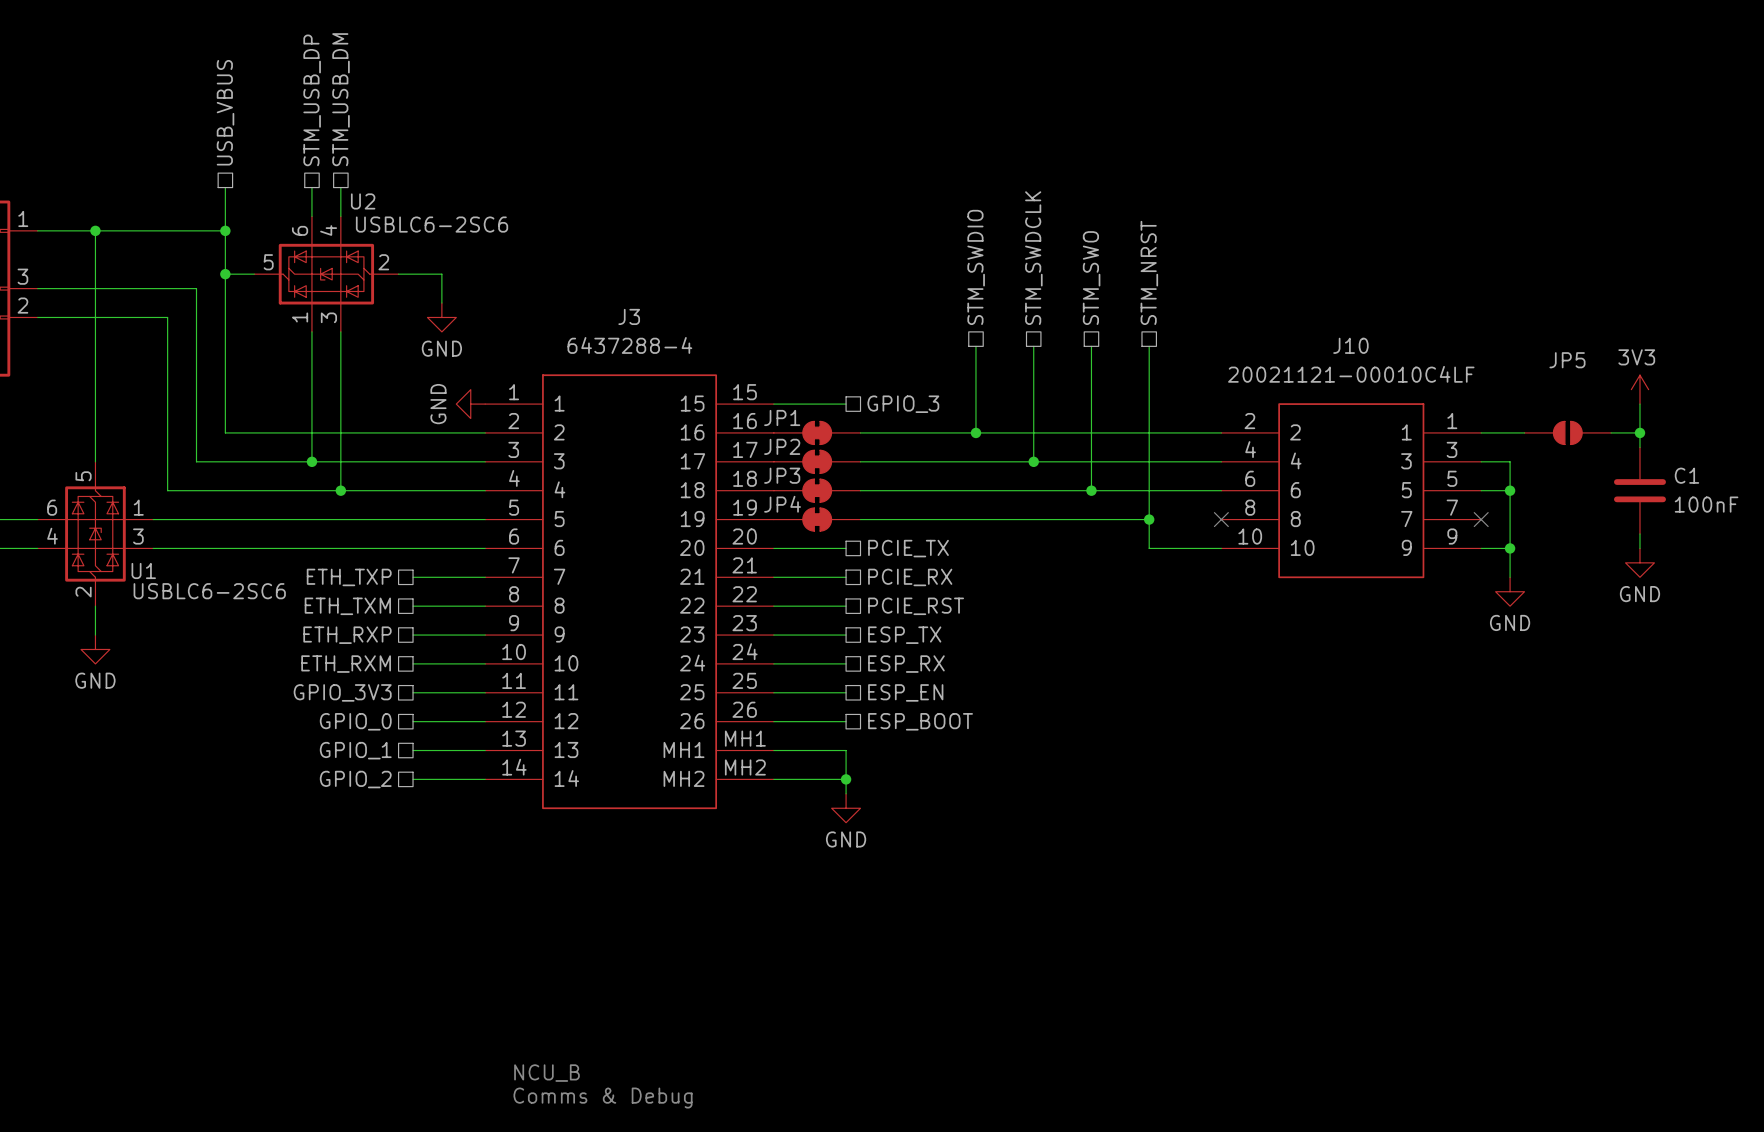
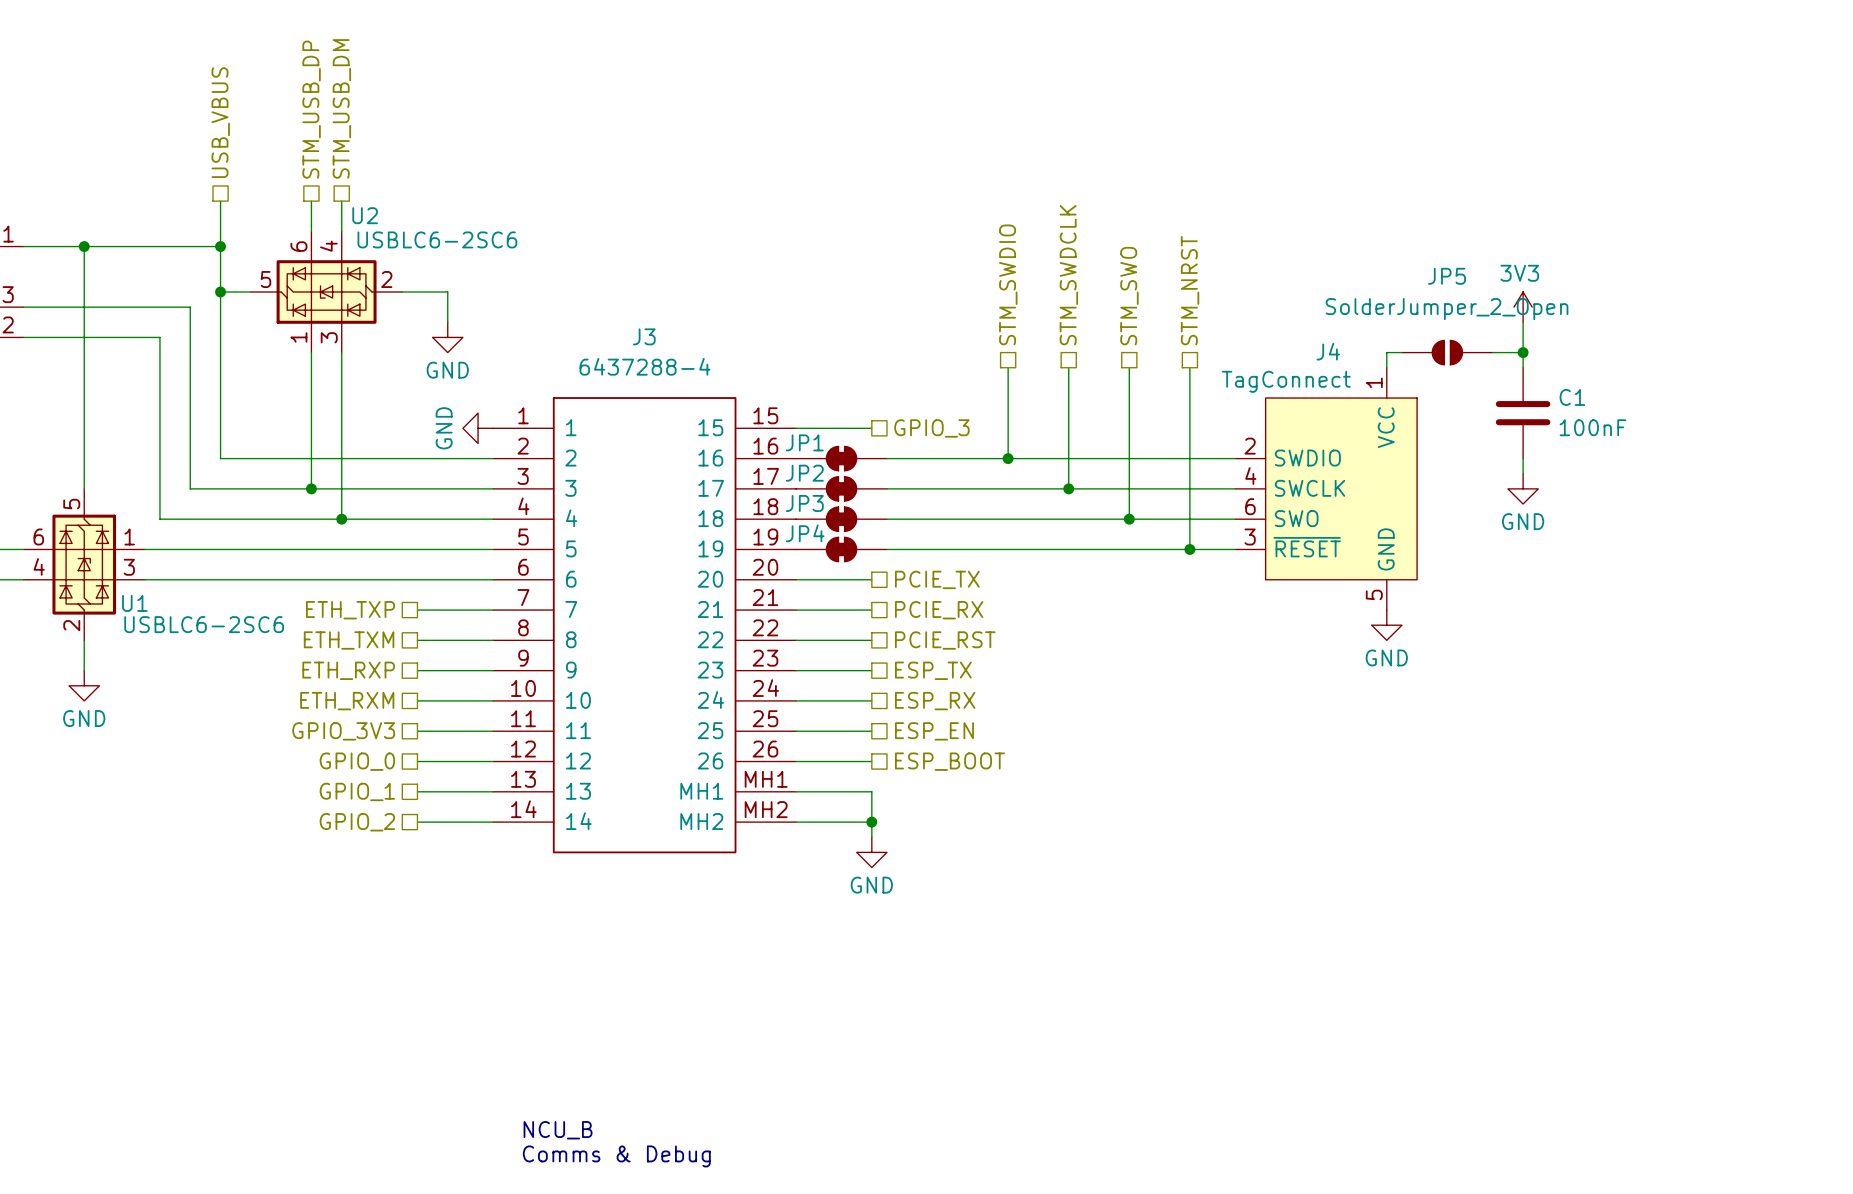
JP5 value: none -> SolderJumper_2_Open (1447, 309)
wire: none -> (1401, 352) (1386, 352) (1386, 367)
junction: none -> (1523, 352)
power symbol position: 3V3 (1639, 389) -> 3V3 (1523, 307)
wire: (1639, 404) (1639, 447) -> (1523, 322) (1523, 367)
wire: (1481, 432) (1524, 432) -> none
JP5 position: (1567, 432) -> (1447, 352)
wire: (1611, 432) (1639, 432) -> (1492, 352) (1523, 352)
junction: (1639, 432) -> none
J4: none -> TagConnect (1326, 488)
power symbol: none -> GND (1523, 488)
wire: (1481, 461) (1510, 461) (1510, 577) -> none
J10: 20021121-00010C4LF (1351, 490) -> none
wire: (1481, 490) (1510, 490) -> none
junction: (1510, 490) -> none
C1 position: (1639, 490) -> (1523, 413)
wire: (1149, 519) (1149, 548) (1221, 548) -> (1189, 549) (1235, 549)
no-connect mark: (1221, 519) -> none
no-connect mark: (1481, 519) -> none
wire: (1639, 533) (1639, 548) -> (1523, 458) (1523, 473)
wire: (1481, 548) (1510, 548) -> none
junction: (1510, 548) -> none
power symbol: GND (1639, 562) -> none
power symbol: none -> GND (1386, 625)
power symbol: GND (1510, 591) -> none

